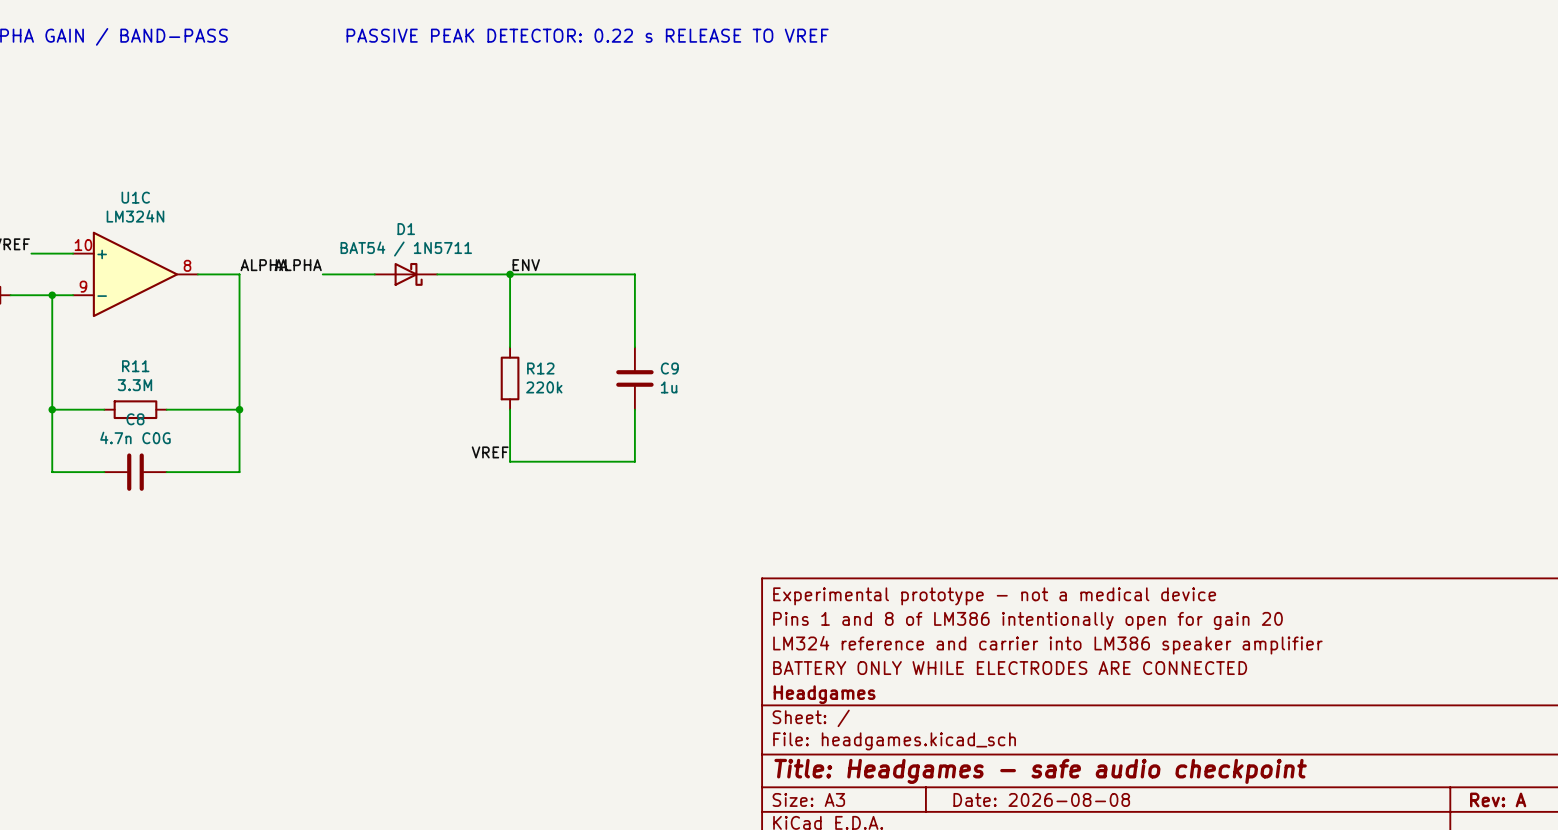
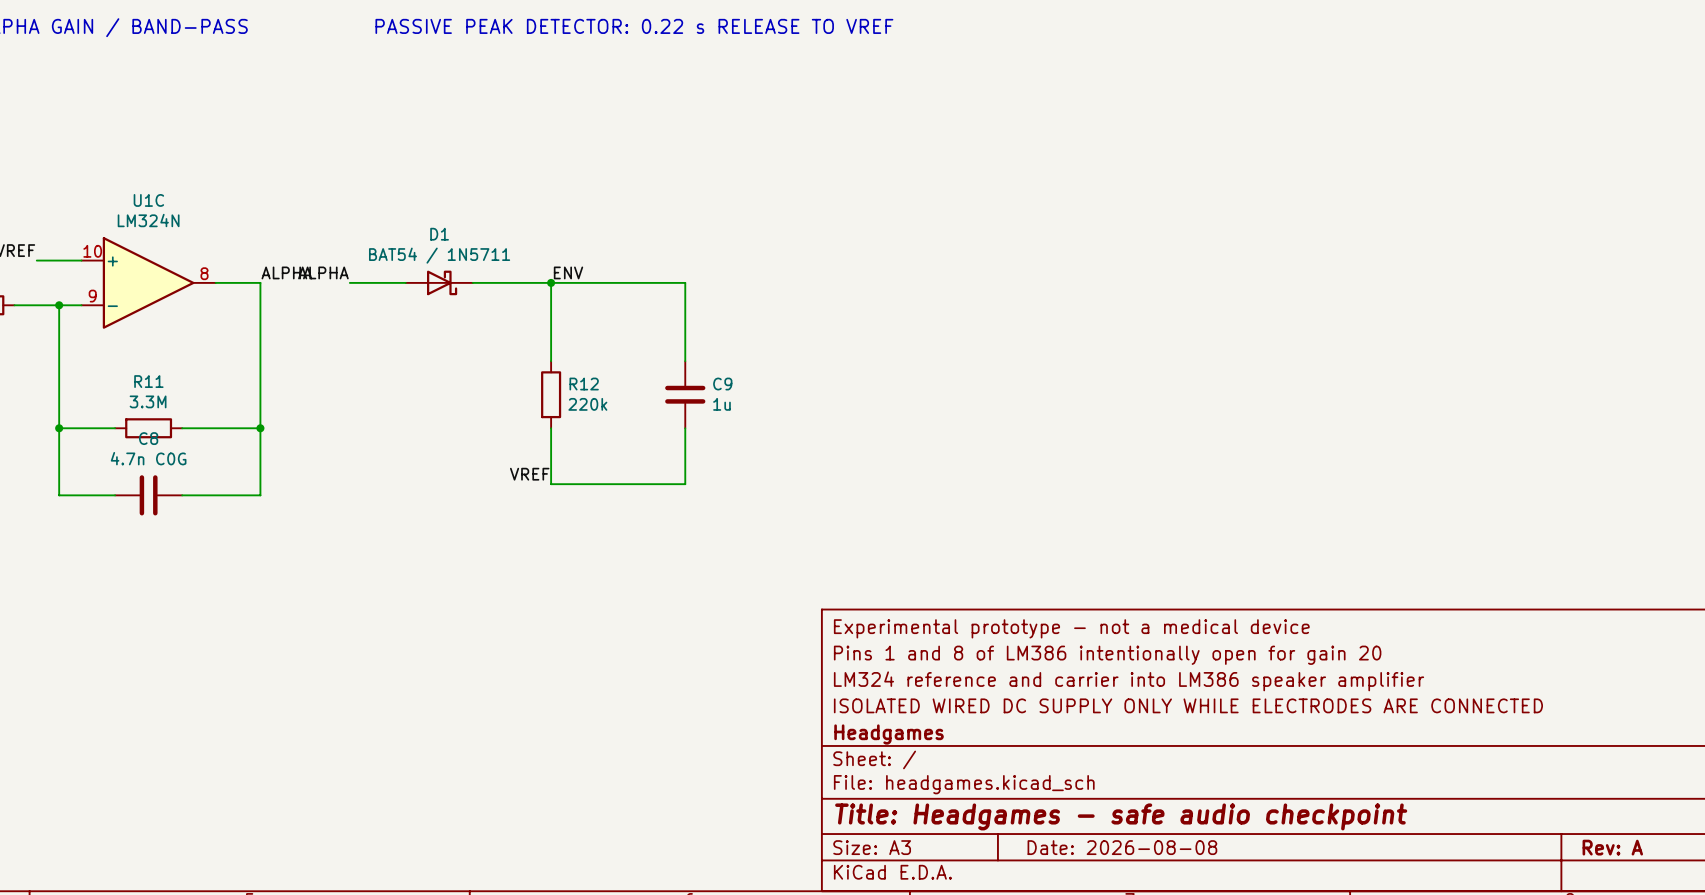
title block: BATTERY ONLY WHILE ELECTRODES ARE CONNECTED (1010, 668) -> ISOLATED WIRED DC SUPPLY ONLY WHILE ELECTRODES ARE CONNECTED (1188, 705)

